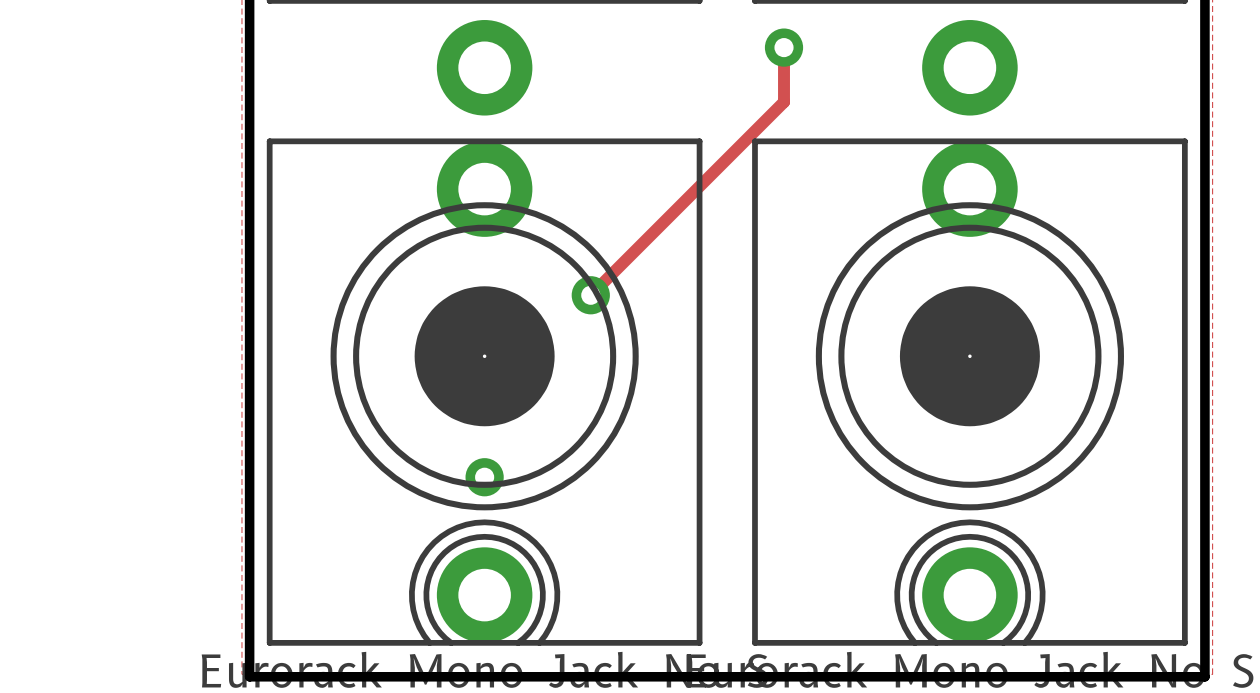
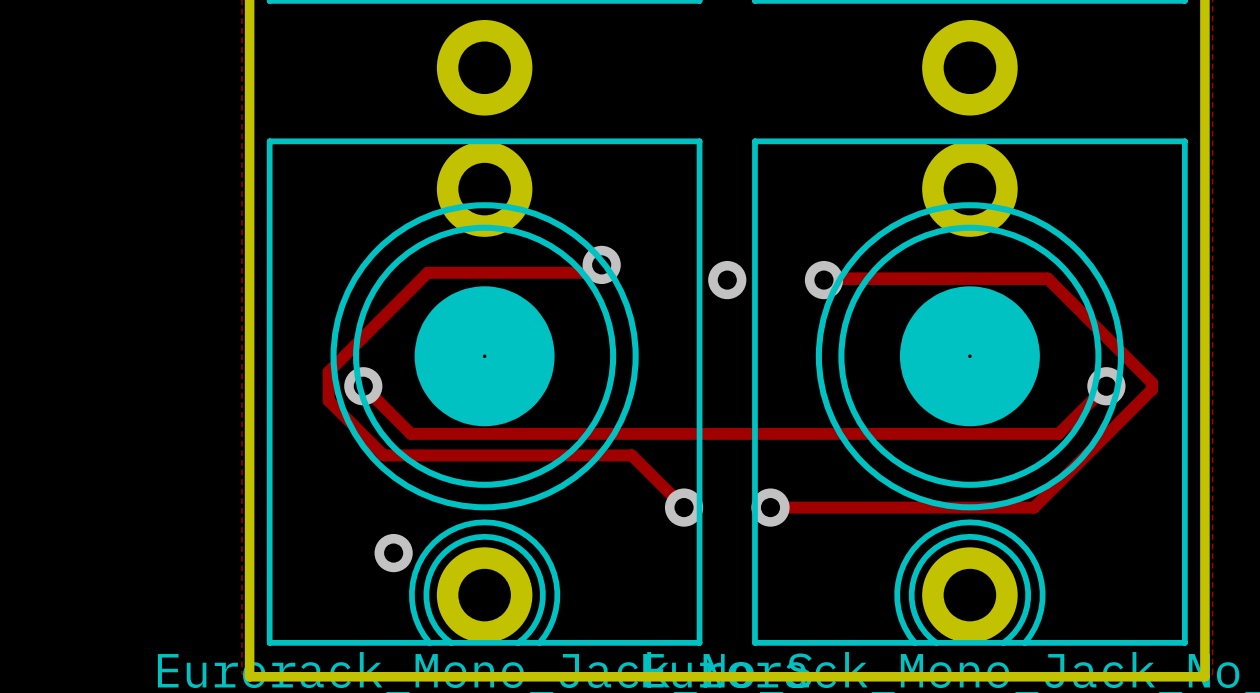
track: (784, 47) (784, 102) (590, 295) -> none
via: (784, 47) -> none
track: none -> (601, 264) (593, 272) (427, 272) (328, 371) (328, 400) (383, 455) (631, 455) (684, 507)
via: none -> (727, 280)
track: none -> (823, 280) (1047, 278) (1151, 382) (1151, 389) (1034, 507) (770, 507)
via: none -> (823, 280)
via position: (590, 295) -> (601, 264)
track: none -> (363, 386) (410, 433) (1058, 433) (1106, 386)
via: none -> (363, 386)
via: none -> (1106, 386)
via: (484, 477) -> none
via: none -> (684, 507)
via: none -> (770, 507)
via: none -> (393, 553)

